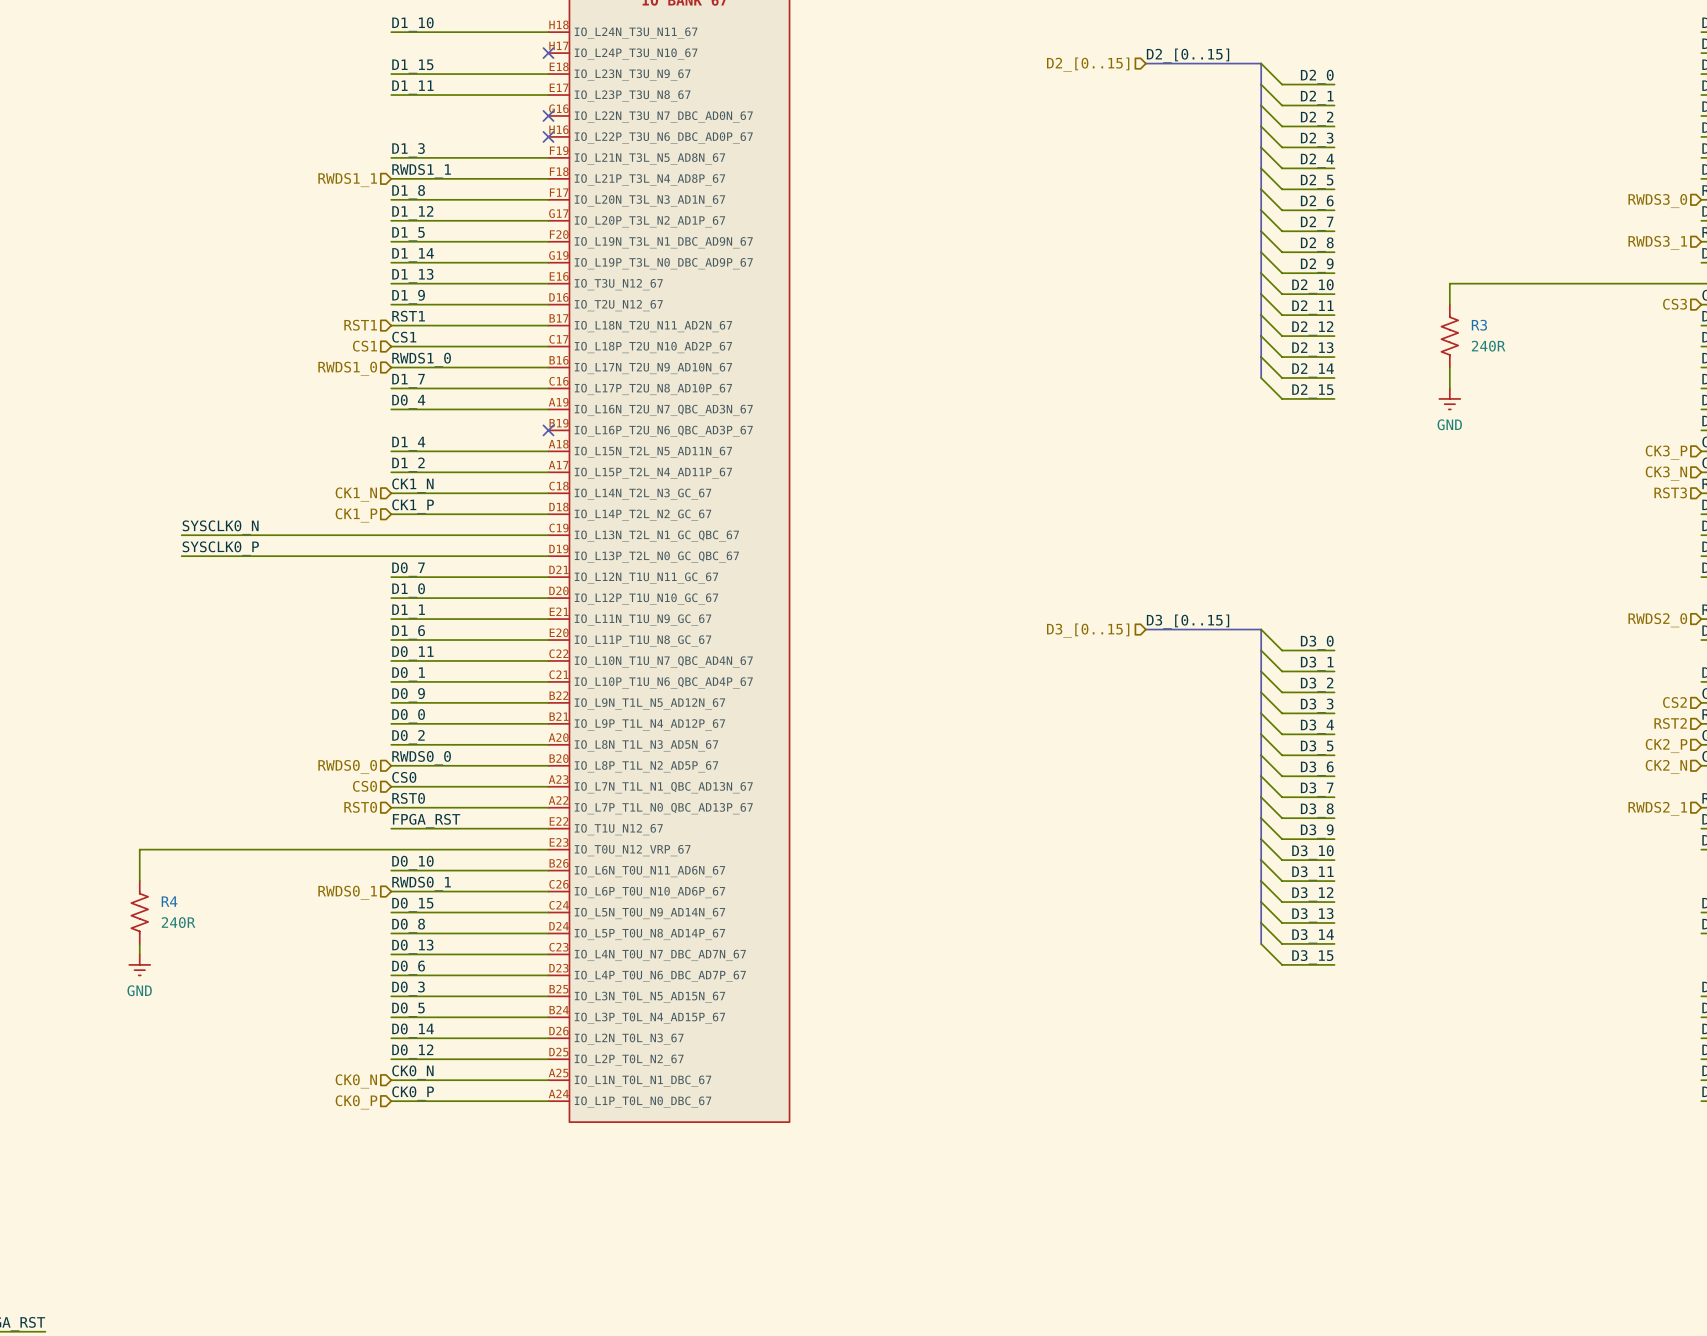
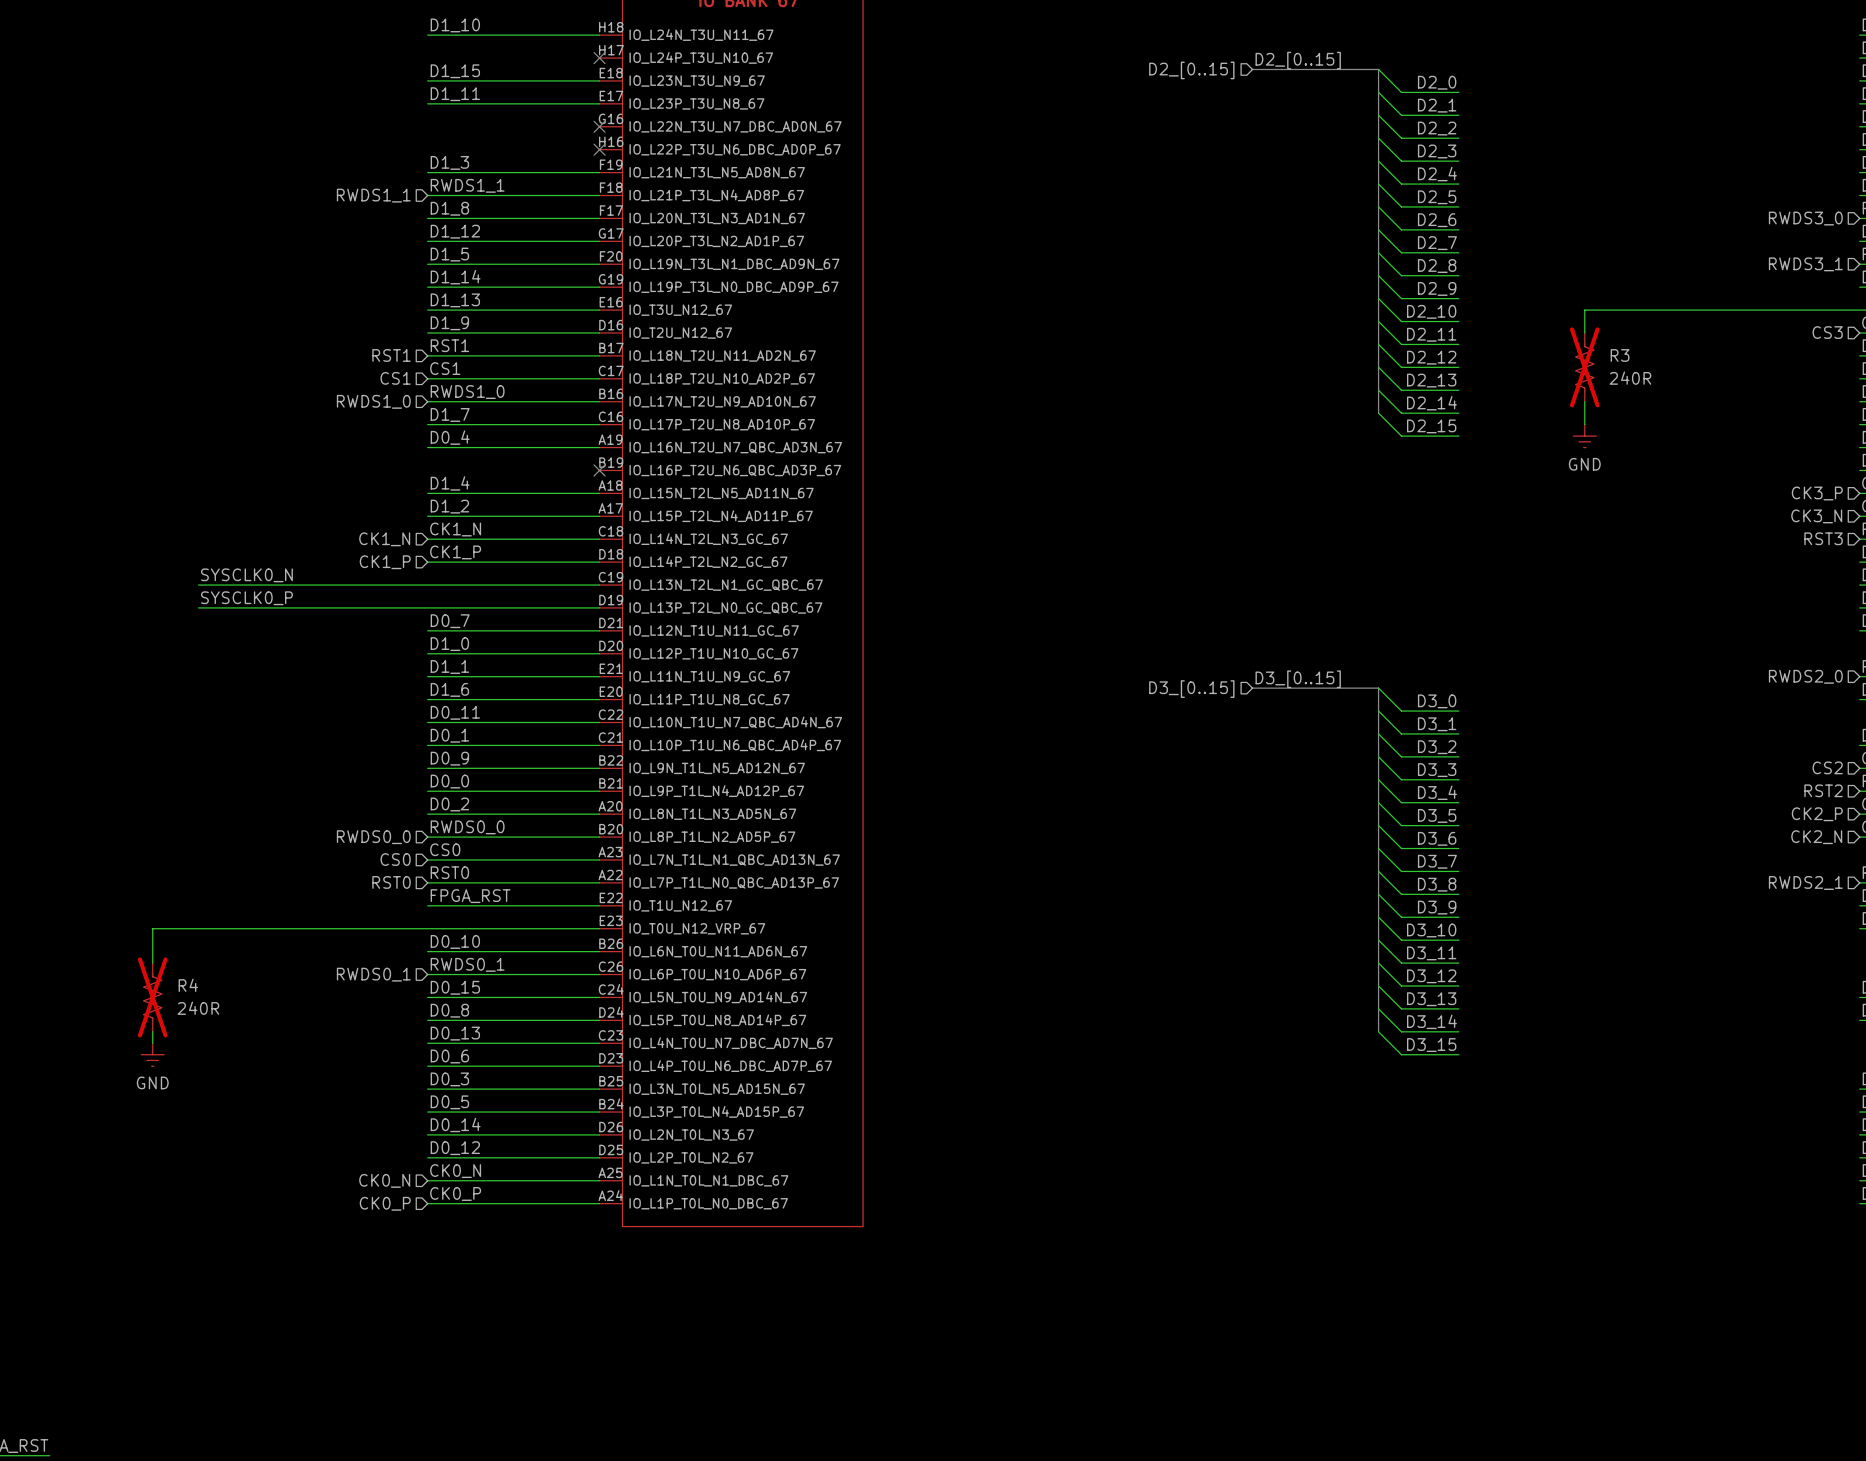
R3 do-not-place cross: none -> (1584, 367)
R4 do-not-place cross: none -> (152, 997)

